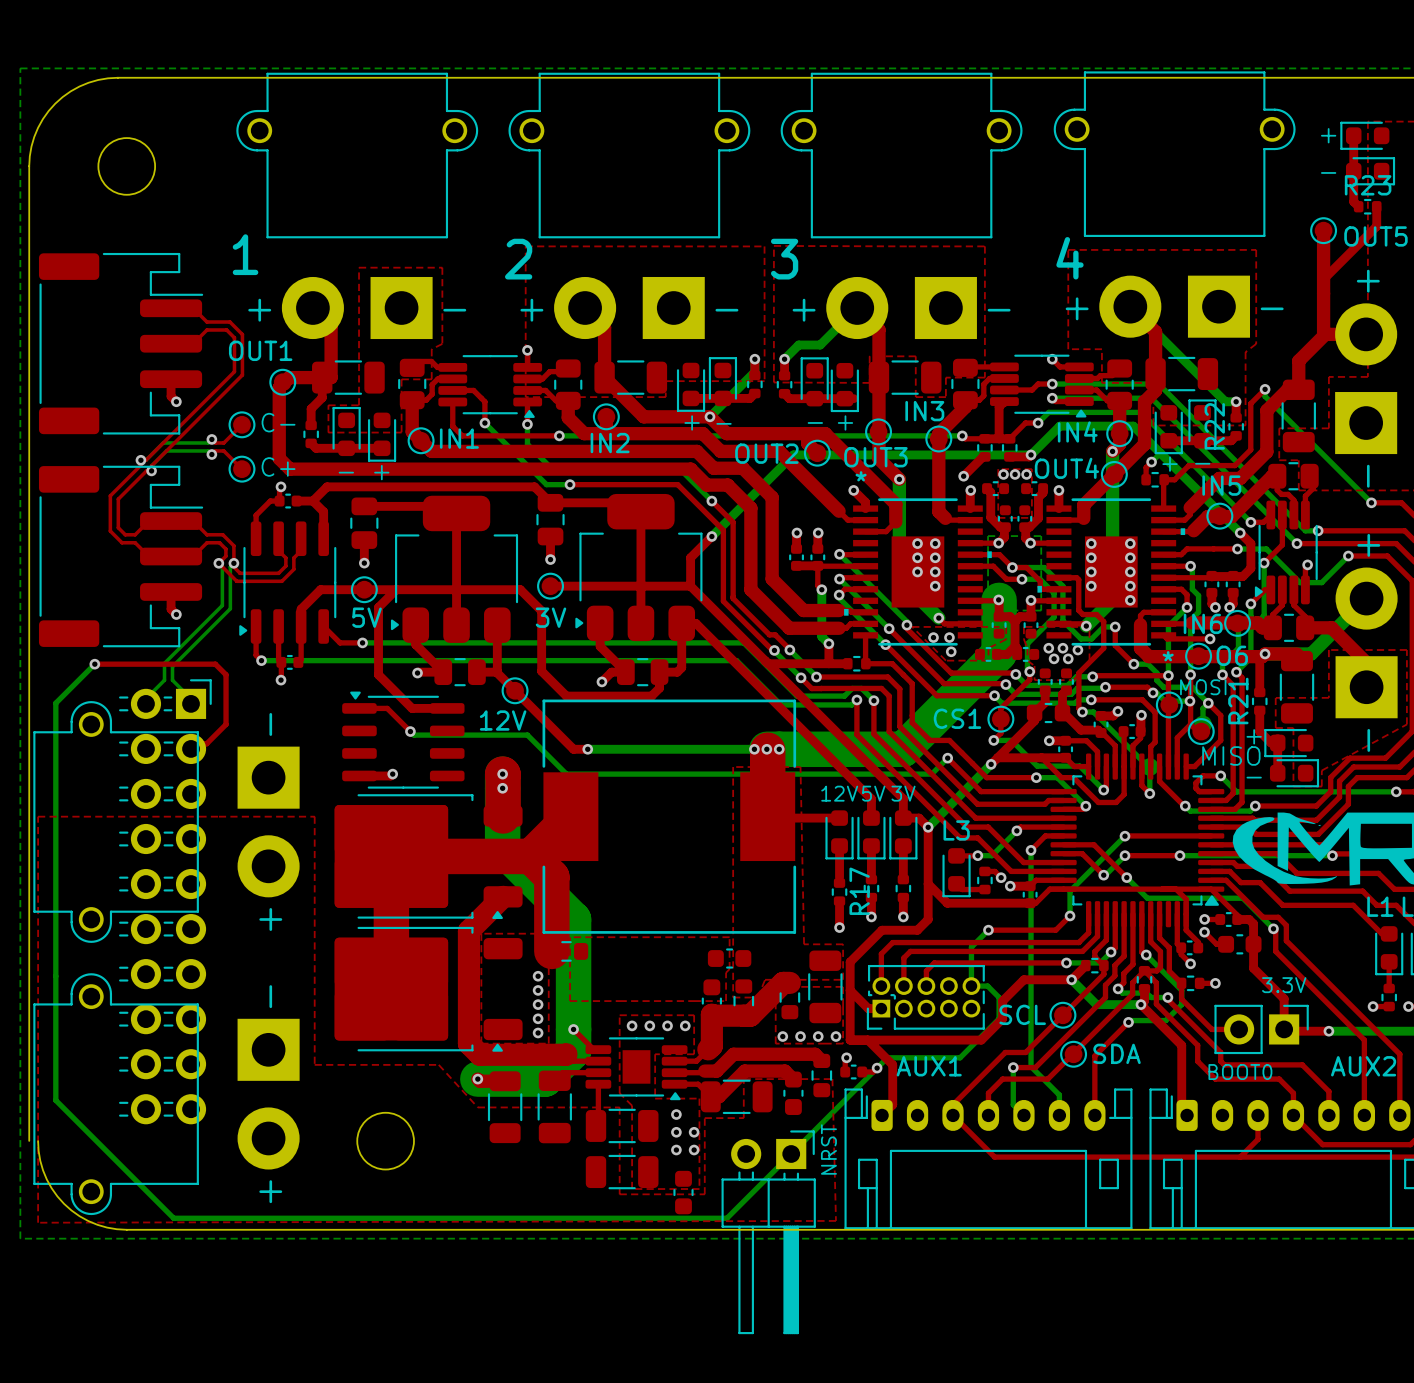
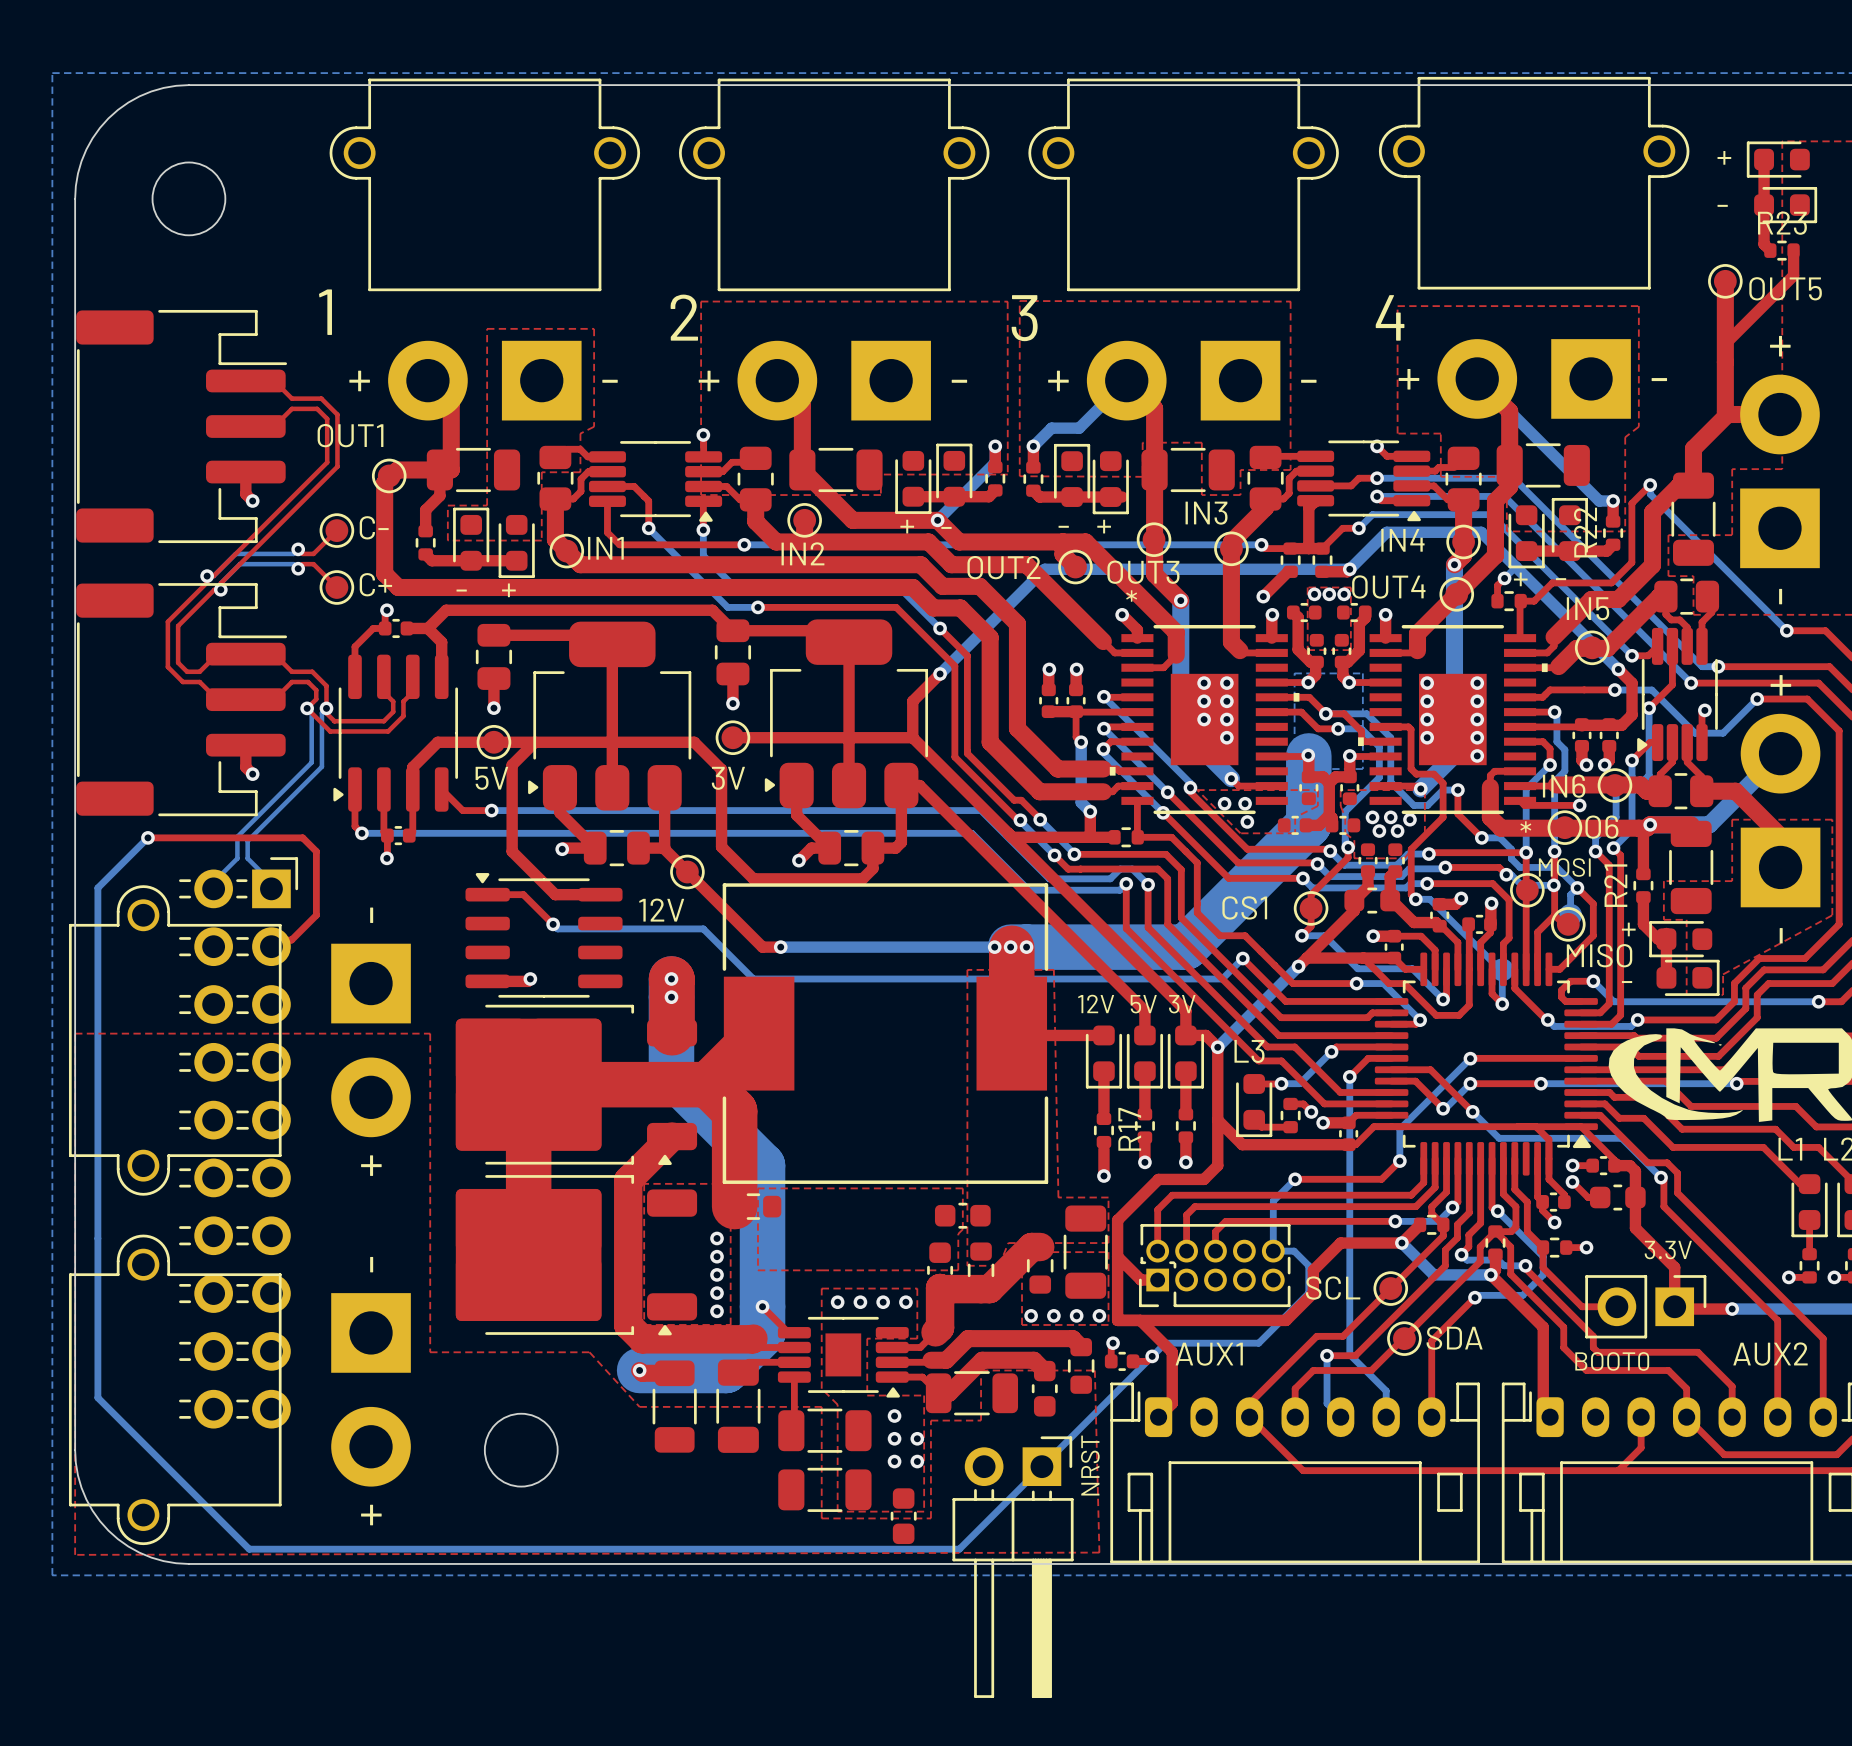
board edge: (126, 77) (107, 78) (88, 82) (70, 91) (55, 103) (42, 119) (34, 136) (29, 166) -> (188, 85) (151, 91) (117, 109) (99, 127) (86, 149) (75, 186) (75, 1450)
board edge: (29, 166) (29, 1140) -> none

